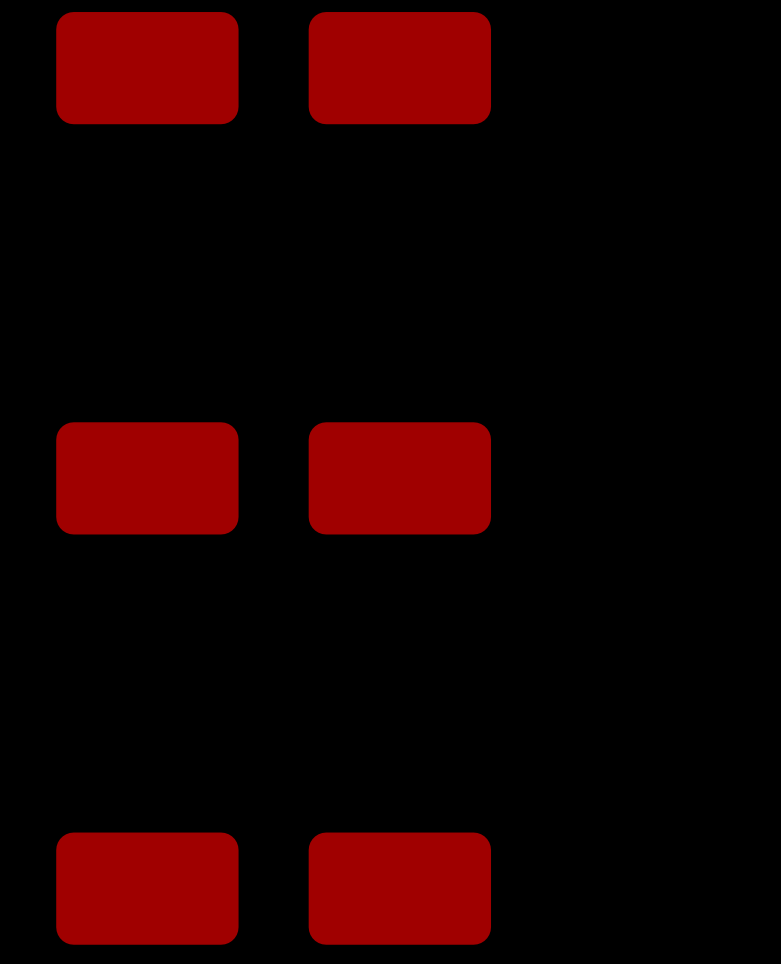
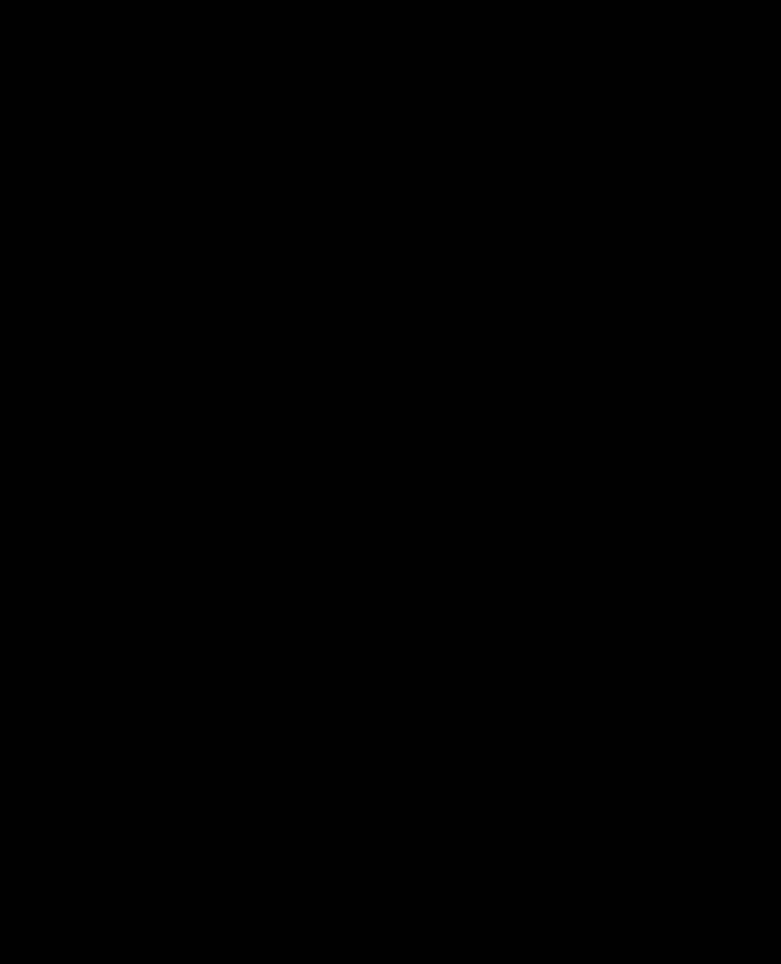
part: (273, 68) -> none
part: (273, 478) -> none
part: (273, 888) -> none

